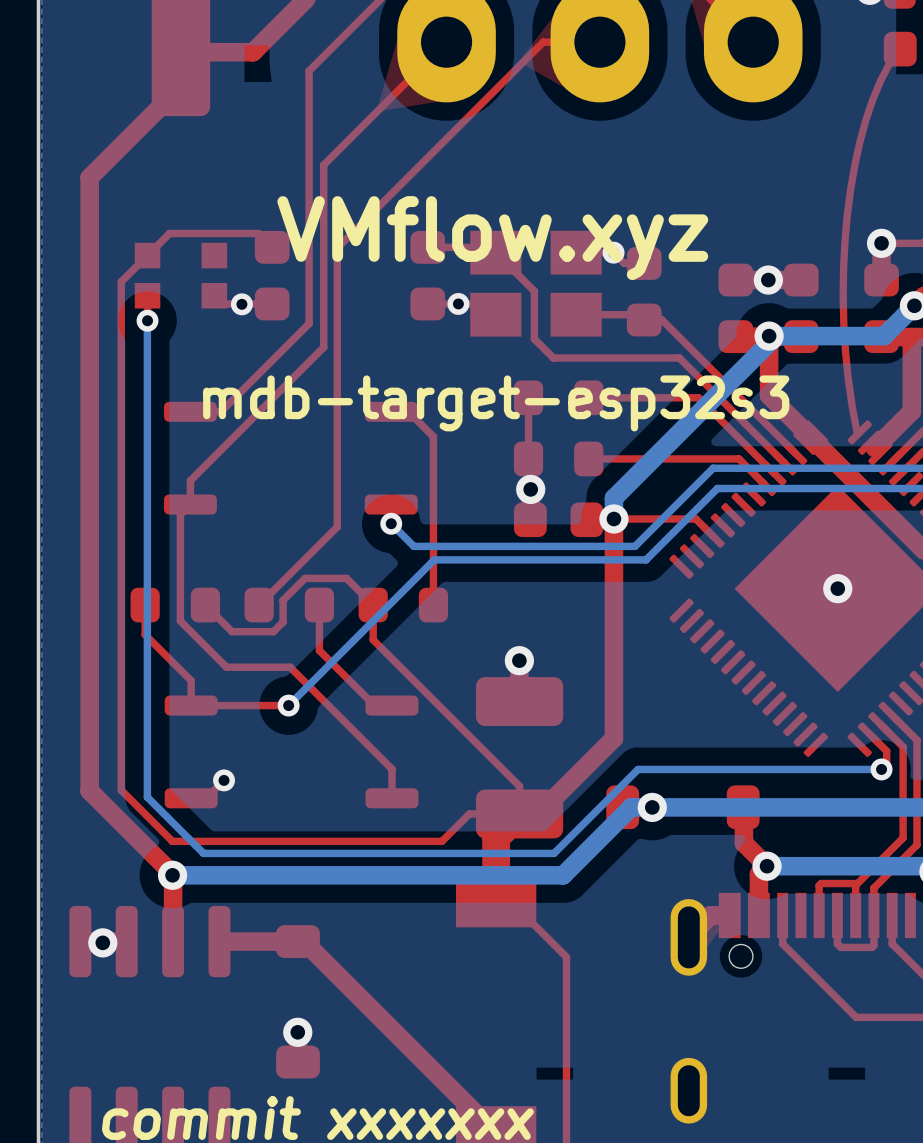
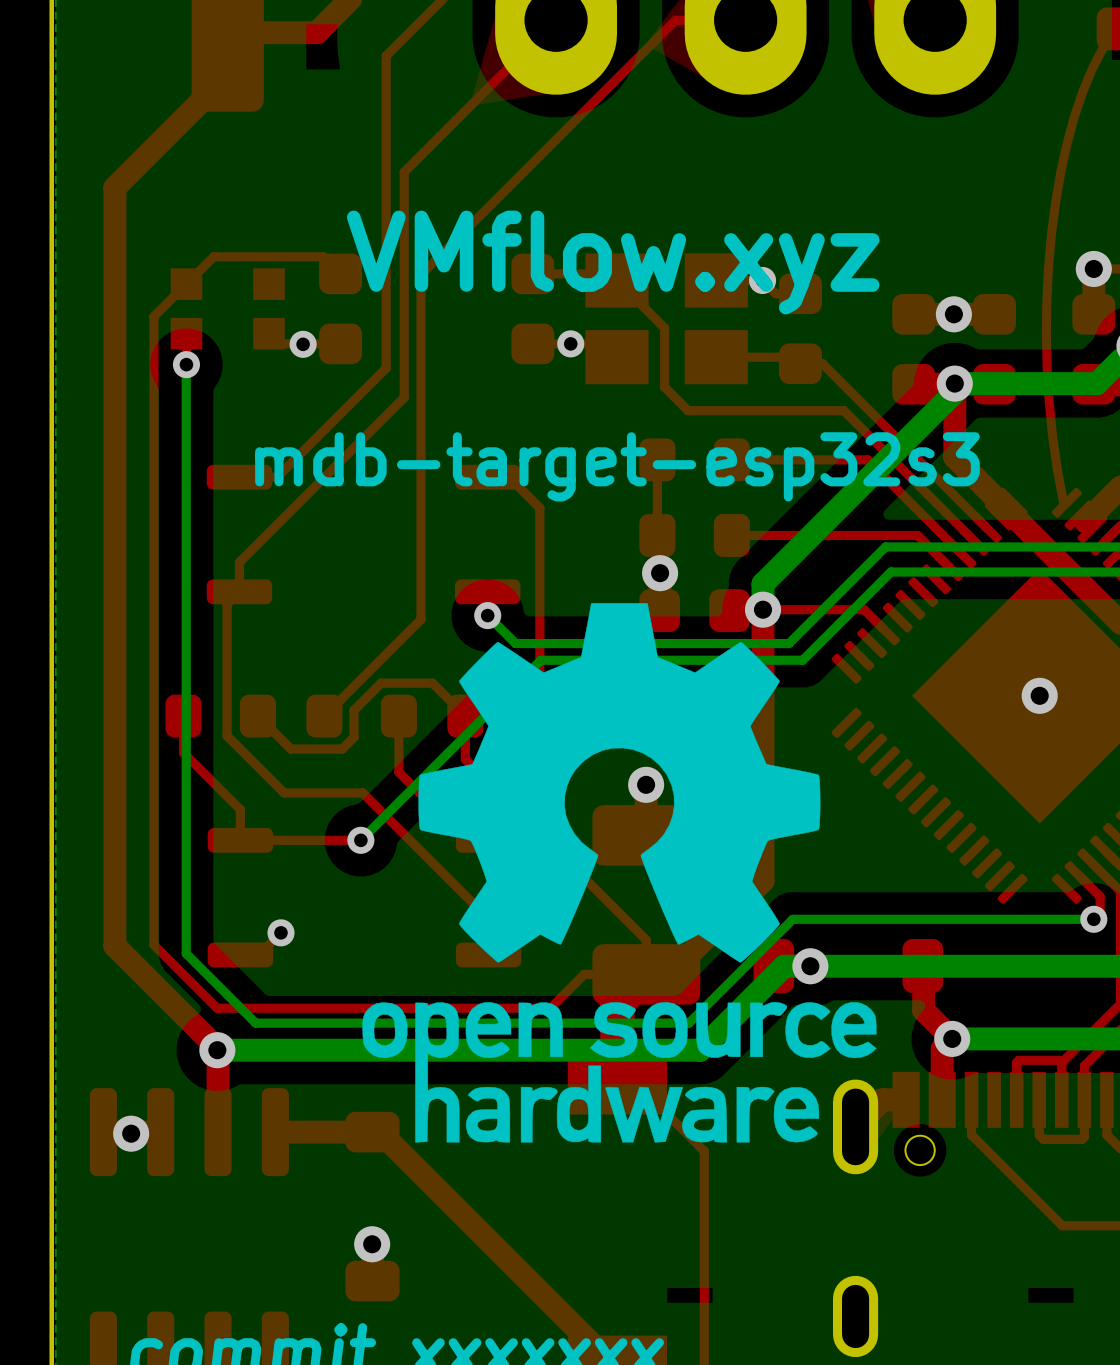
drawing: none -> [362, 603, 877, 1143]

